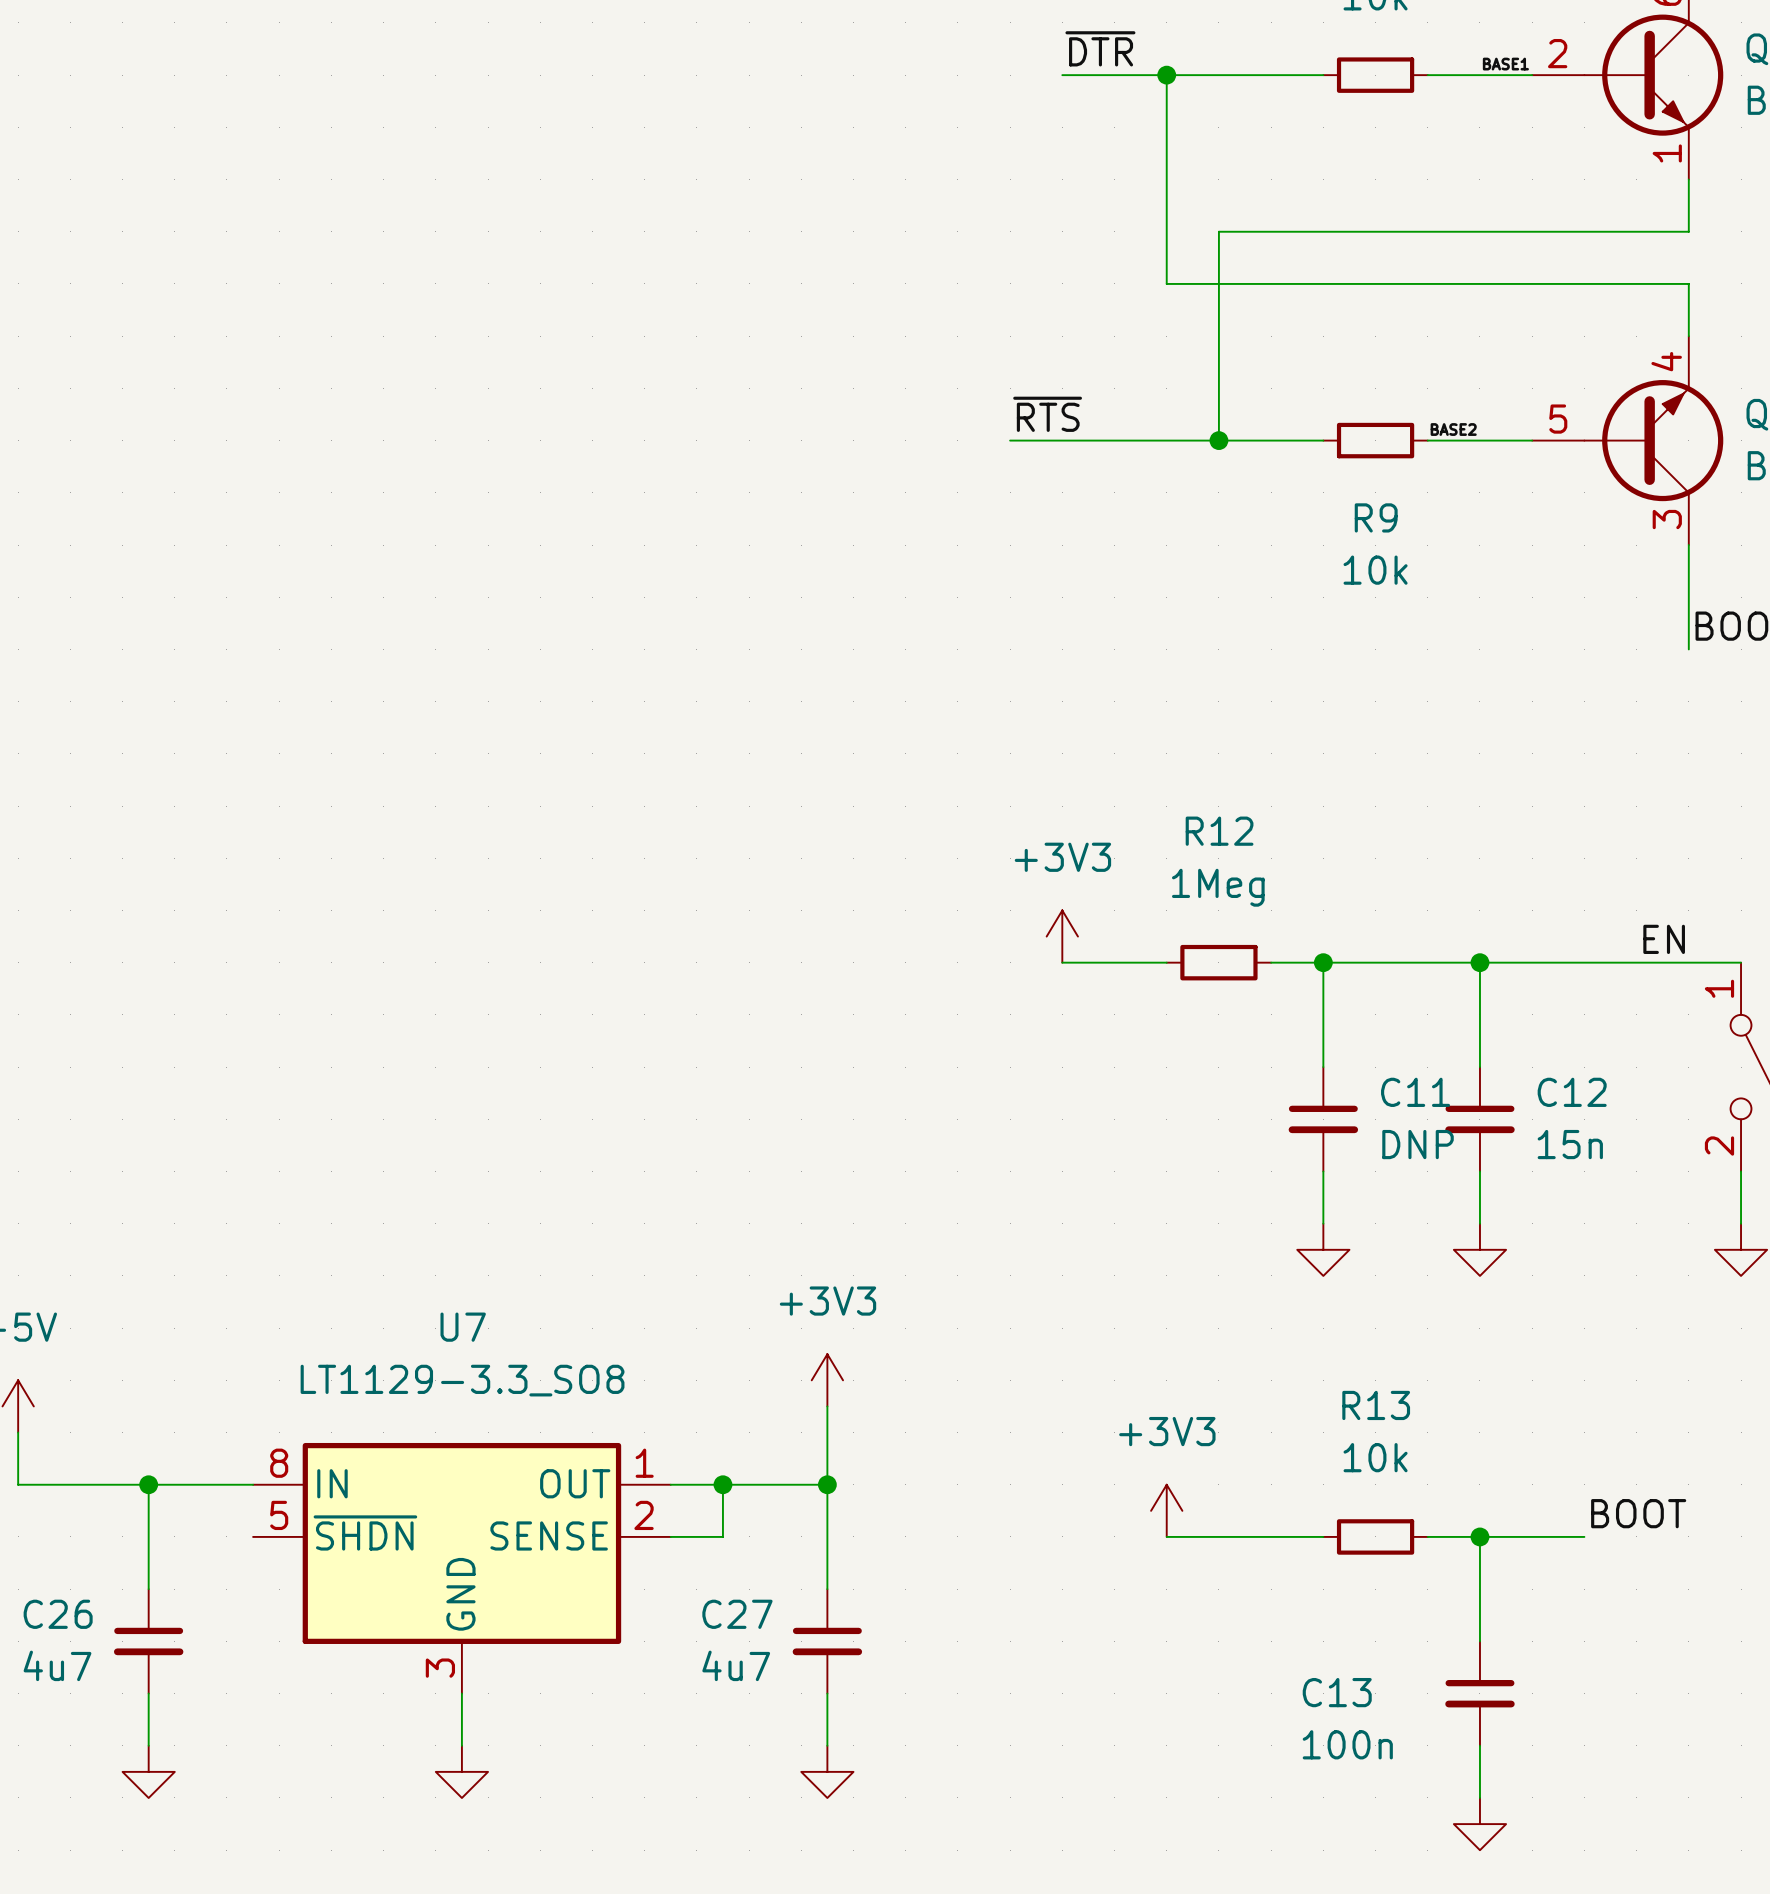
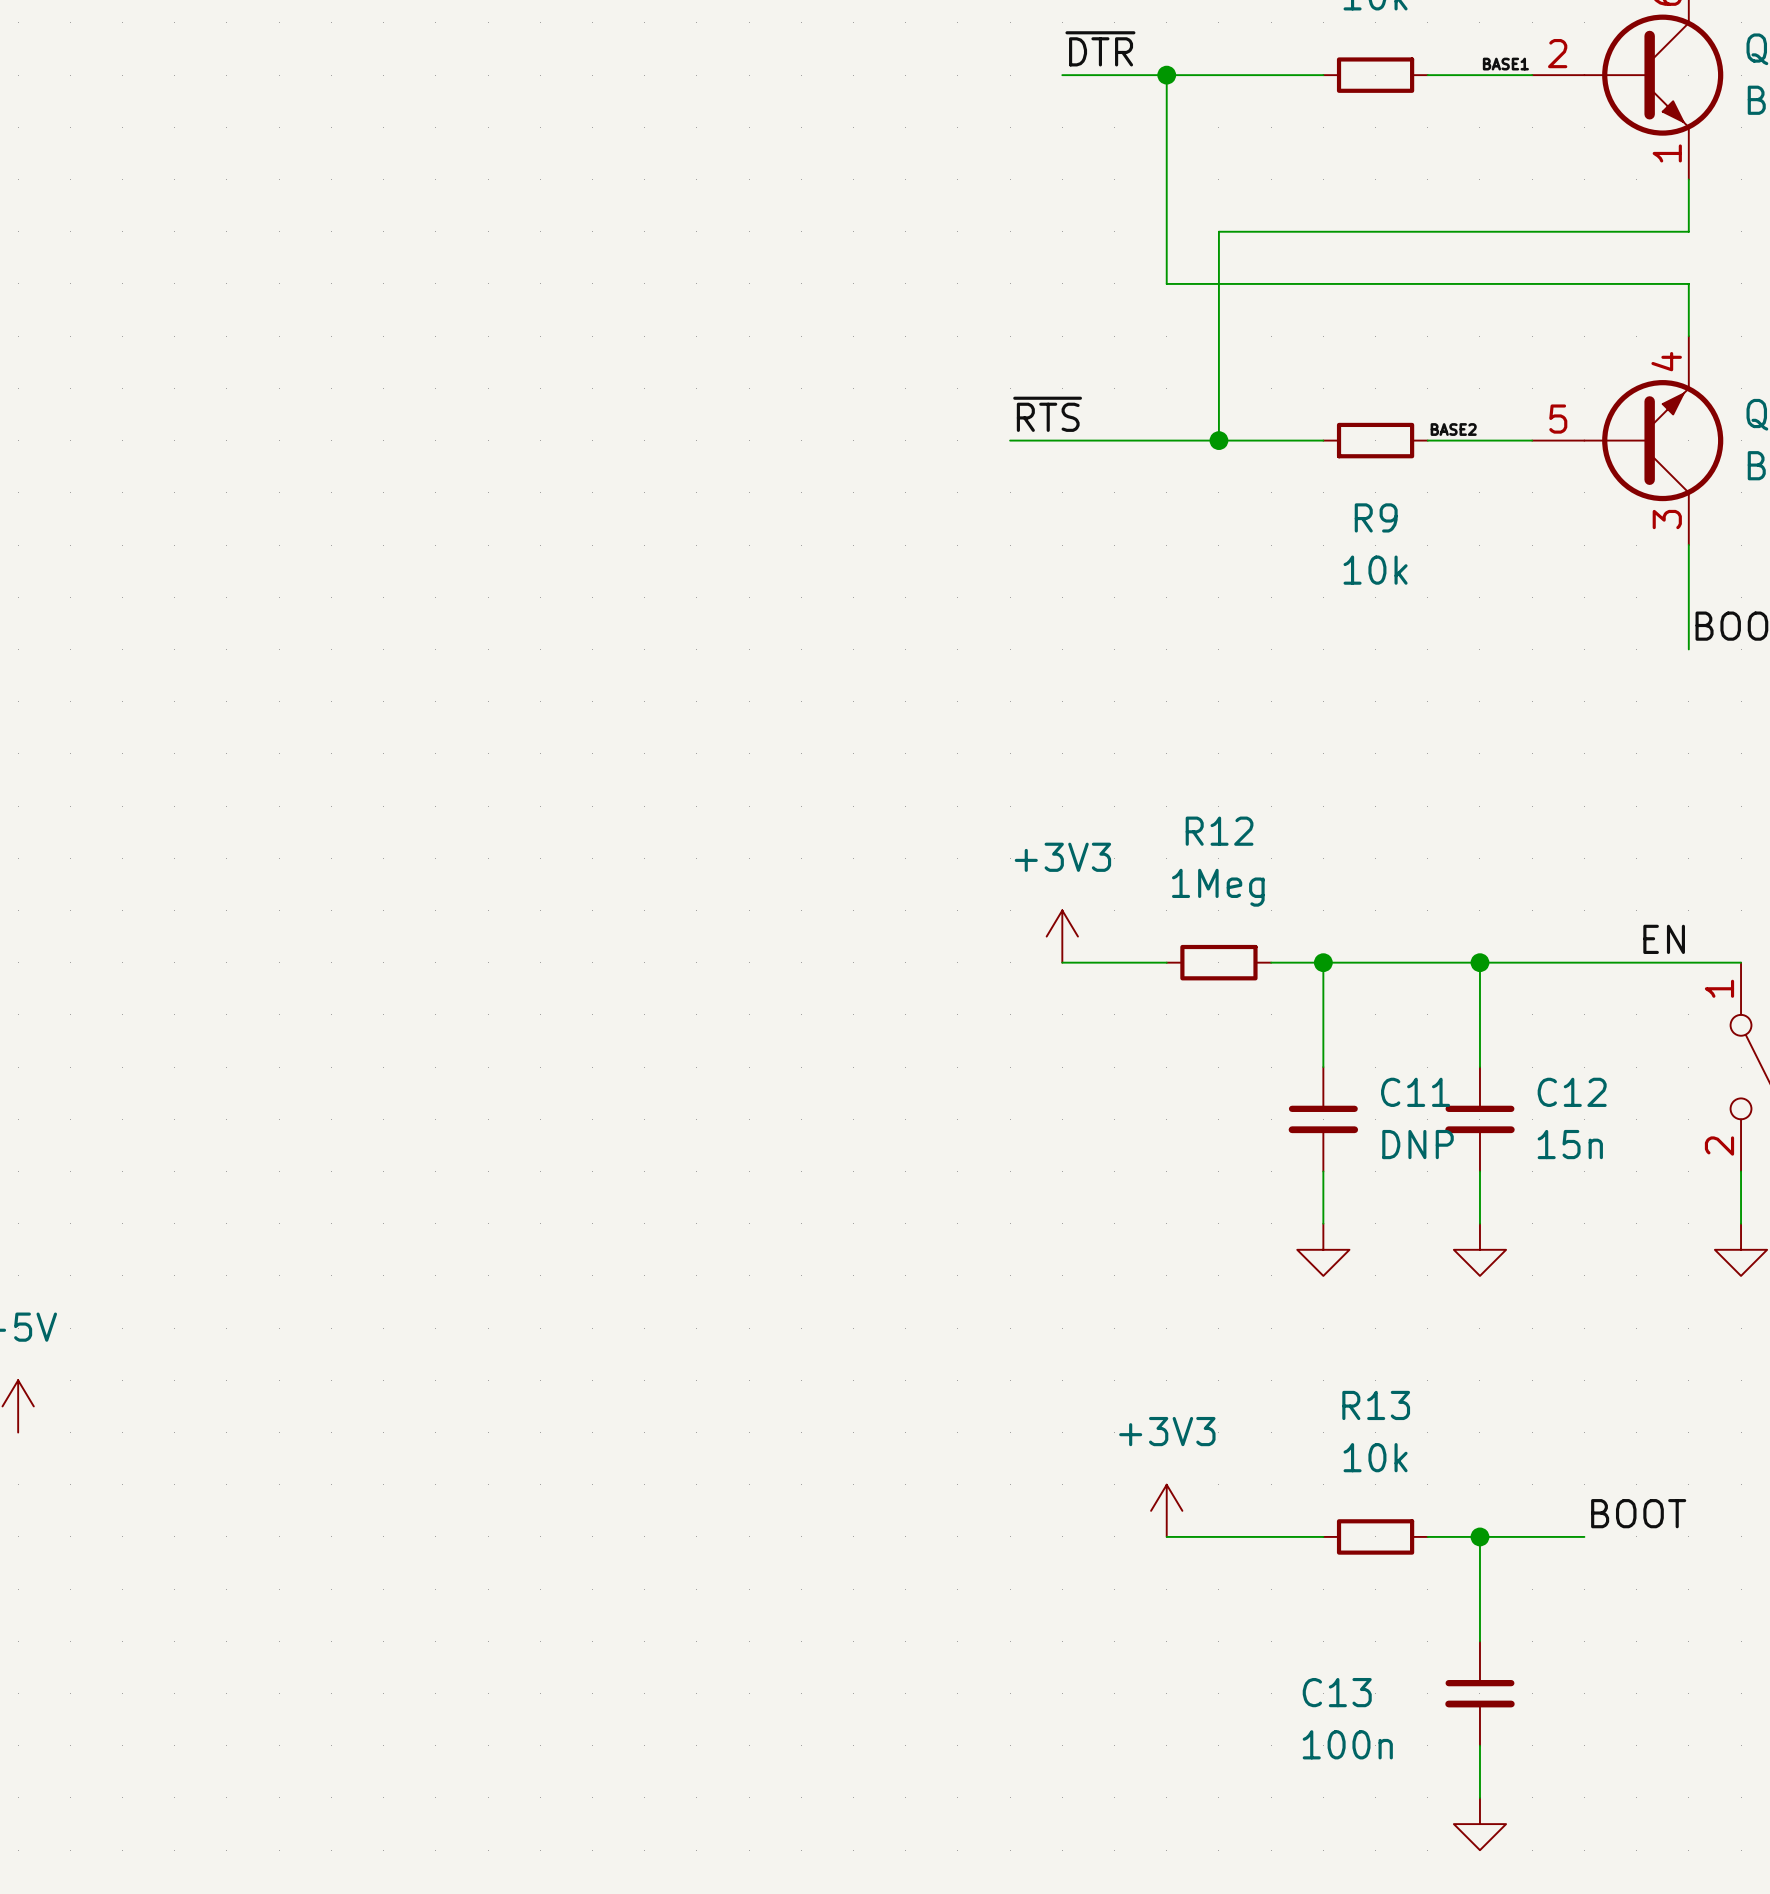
power symbol: +3V3 (827, 1380) -> none
wire: (827, 1406) (827, 1589) -> none
wire: (18, 1432) (18, 1484) (253, 1484) -> none
wire: (148, 1484) (148, 1589) -> none
junction: (148, 1484) -> none
wire: (670, 1484) (827, 1484) -> none
wire: (722, 1484) (722, 1536) (670, 1536) -> none
junction: (722, 1484) -> none
junction: (827, 1484) -> none
U7: LT1129-3.3_SO8 (461, 1568) -> none
C26: 4u7 (148, 1641) -> none
C27: 4u7 (827, 1641) -> none
wire: (148, 1693) (148, 1745) -> none
wire: (461, 1693) (461, 1745) -> none
wire: (827, 1693) (827, 1745) -> none
power symbol: (148, 1771) -> none
power symbol: (461, 1771) -> none
power symbol: (827, 1771) -> none

